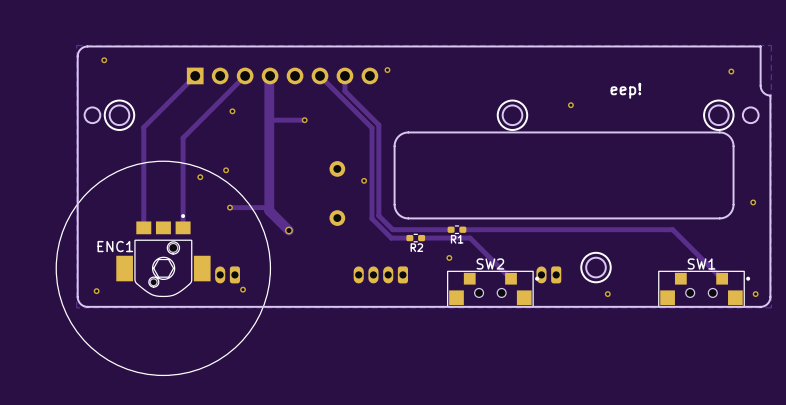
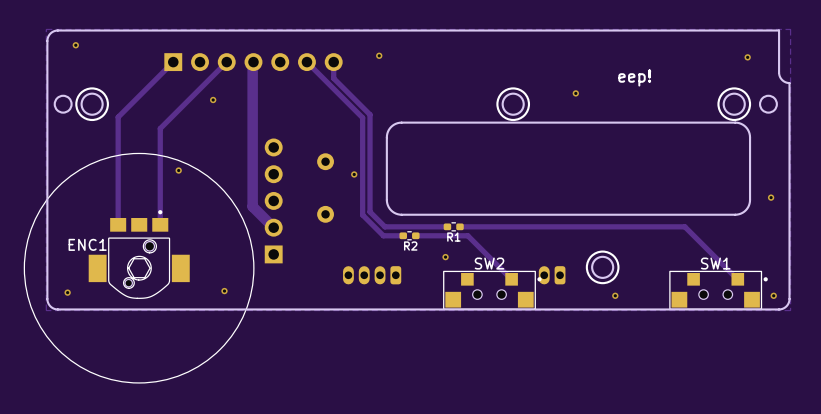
part: (282, 75) -> none
track: (269, 120) (304, 120) -> none
via: (304, 120) -> none
via: (226, 170) -> none
part: none -> (273, 200)
track: (230, 207) (269, 207) -> none
via: (230, 207) -> none
via: (288, 230) -> none
part: (227, 274) -> none

